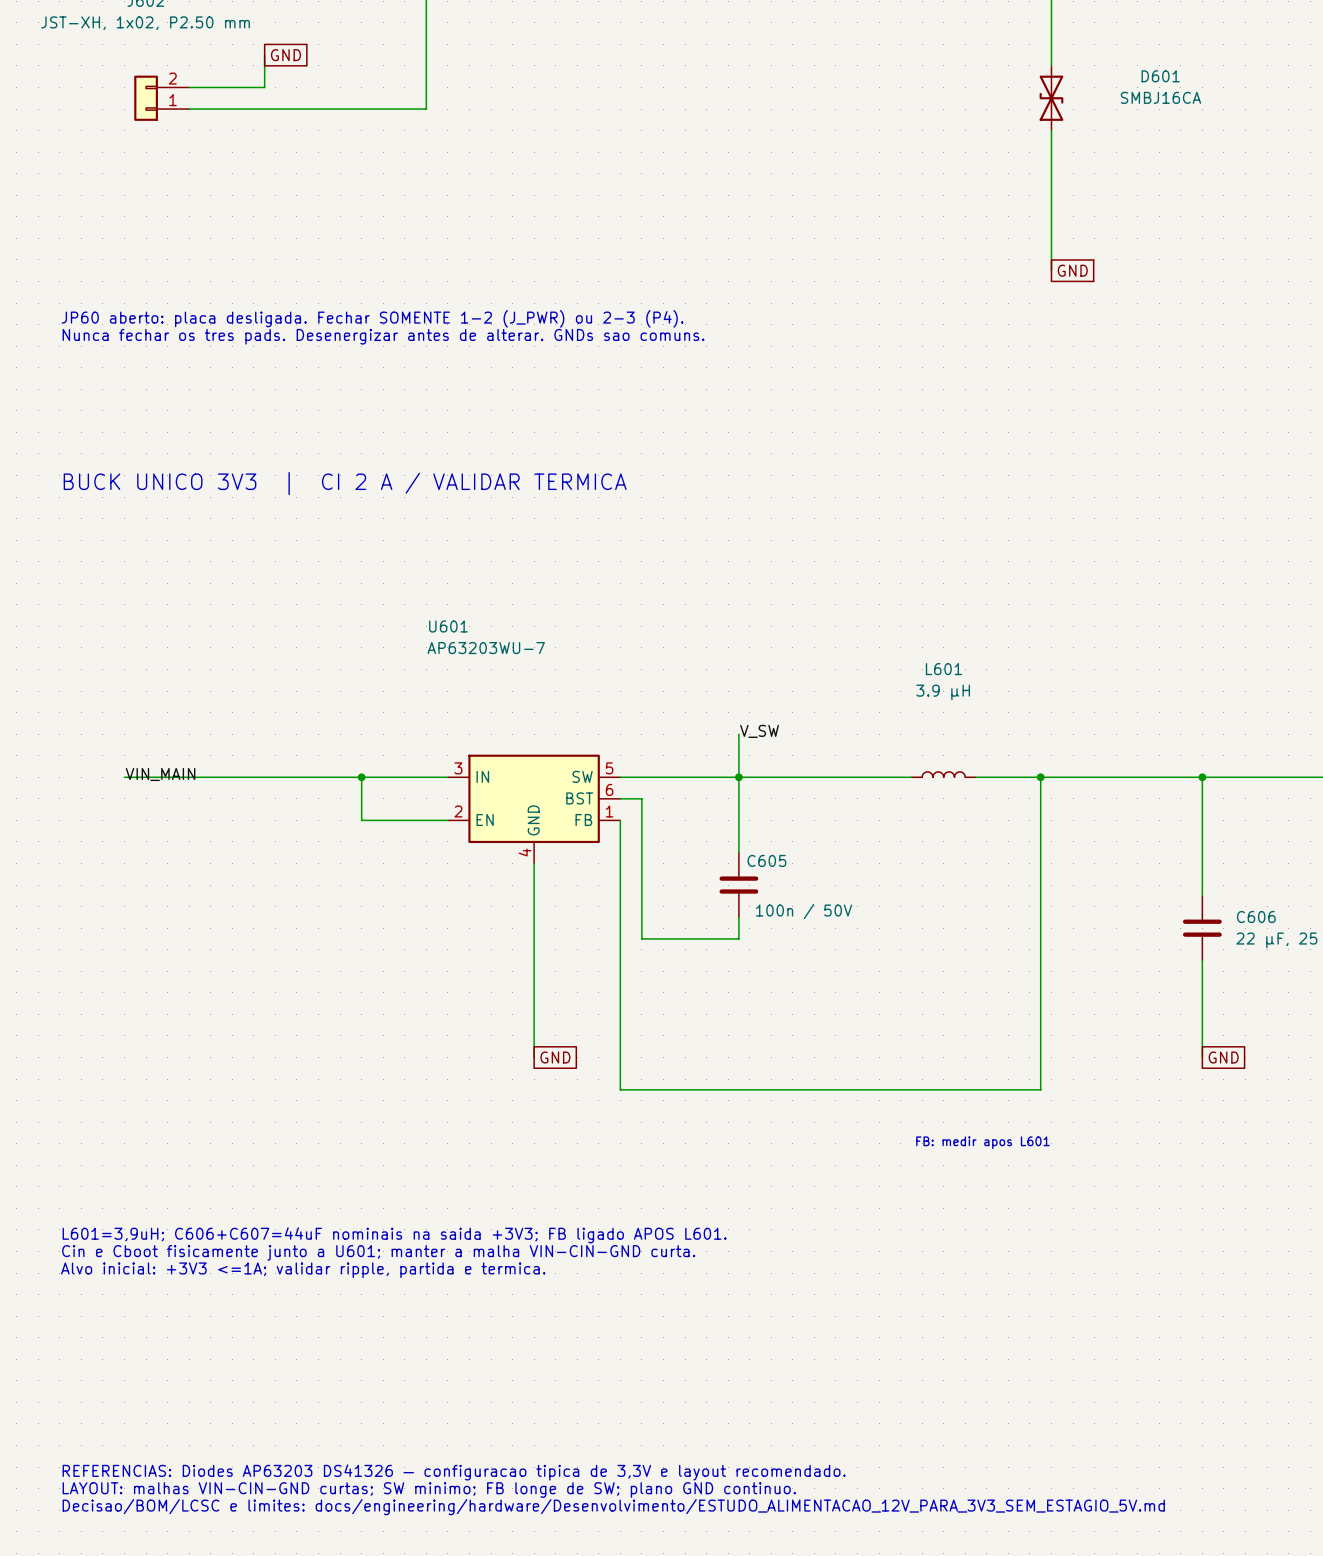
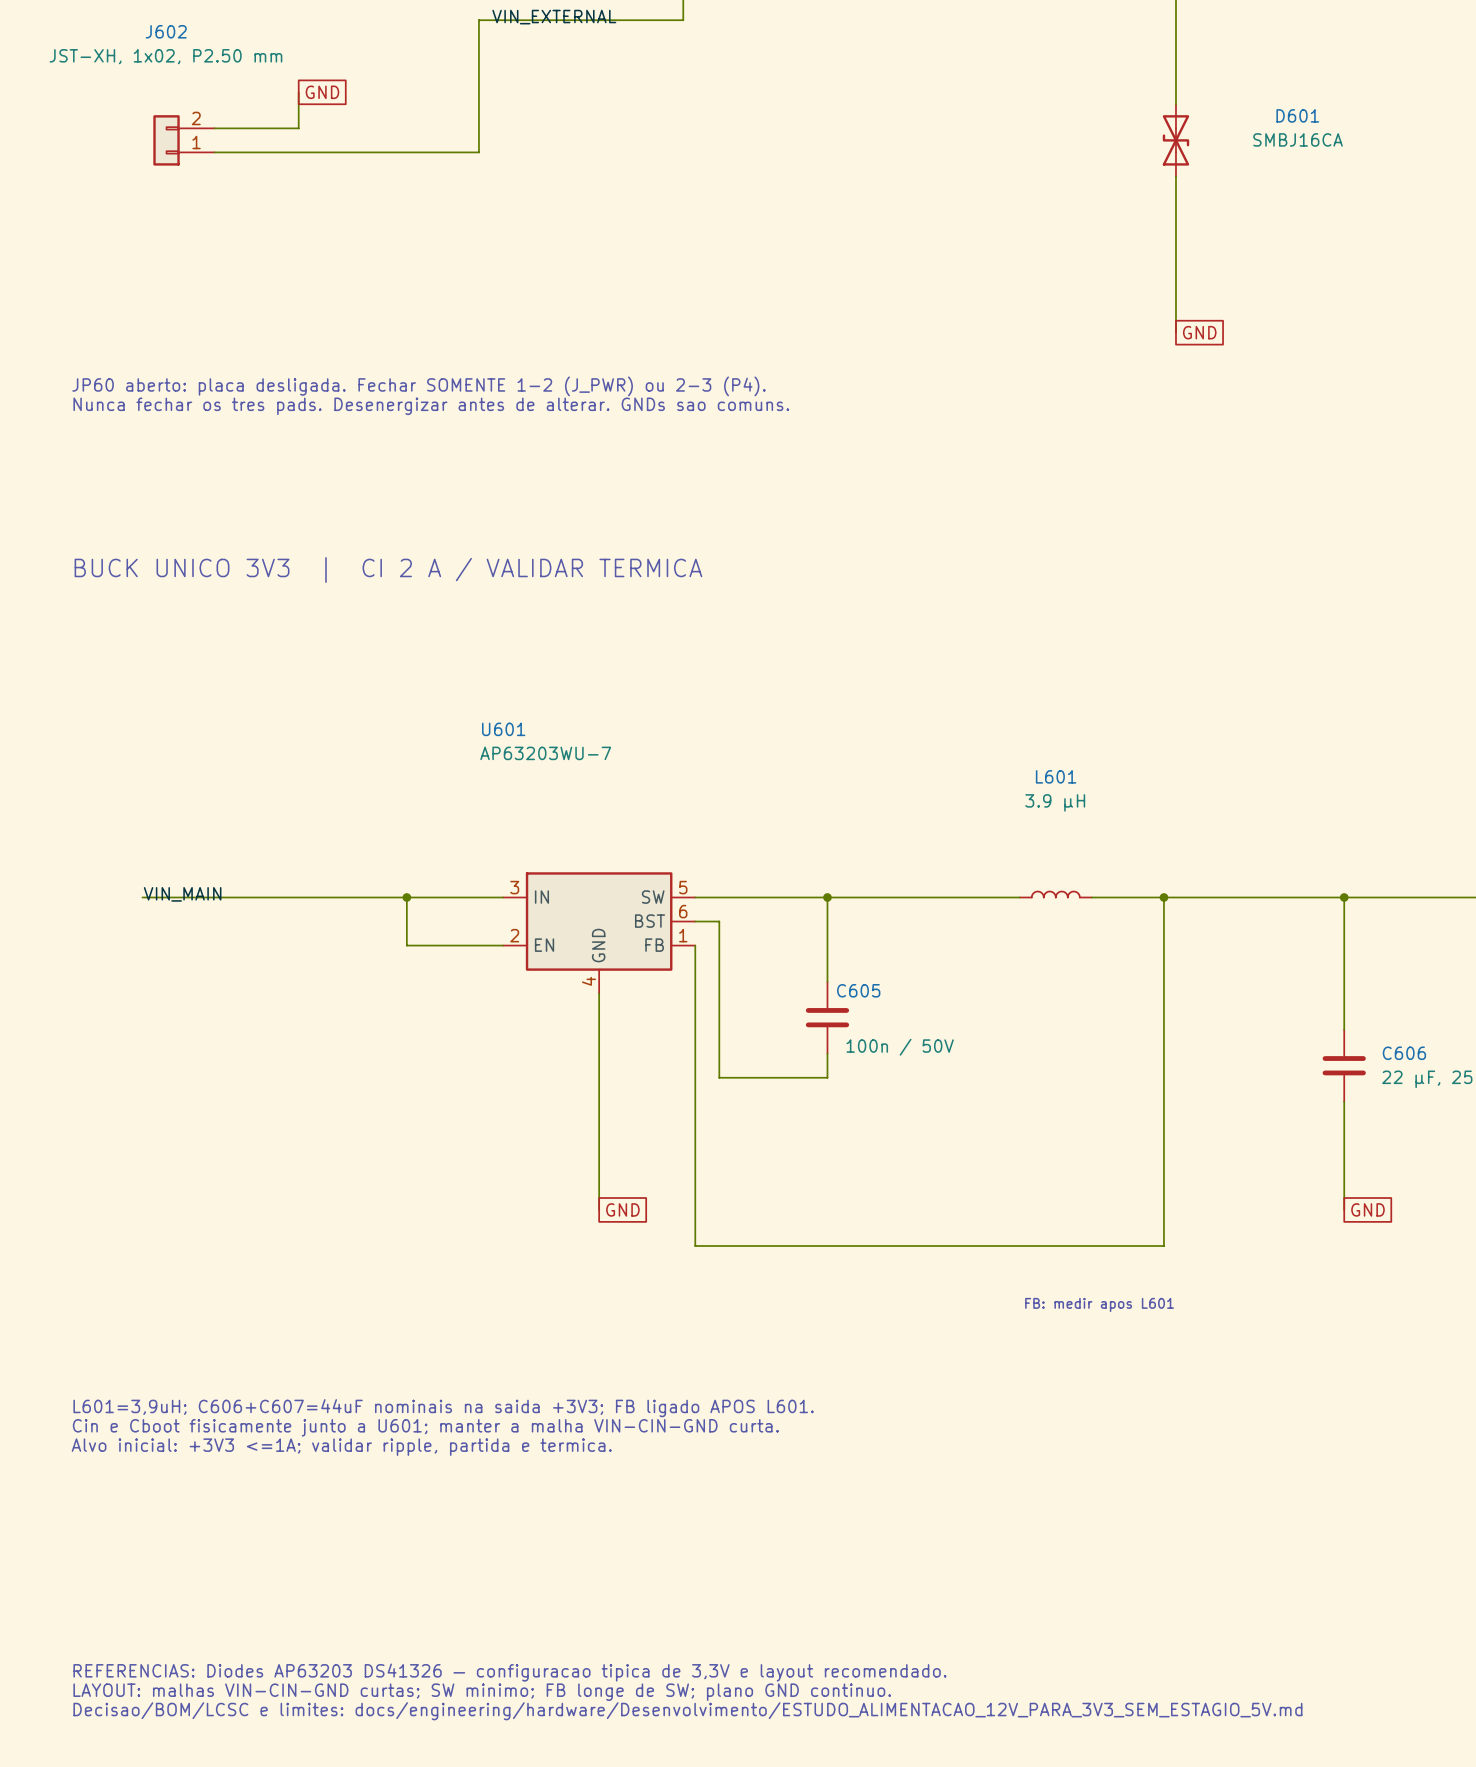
label: V_SW (759, 731) -> none
wire: (738, 734) (738, 777) -> none

